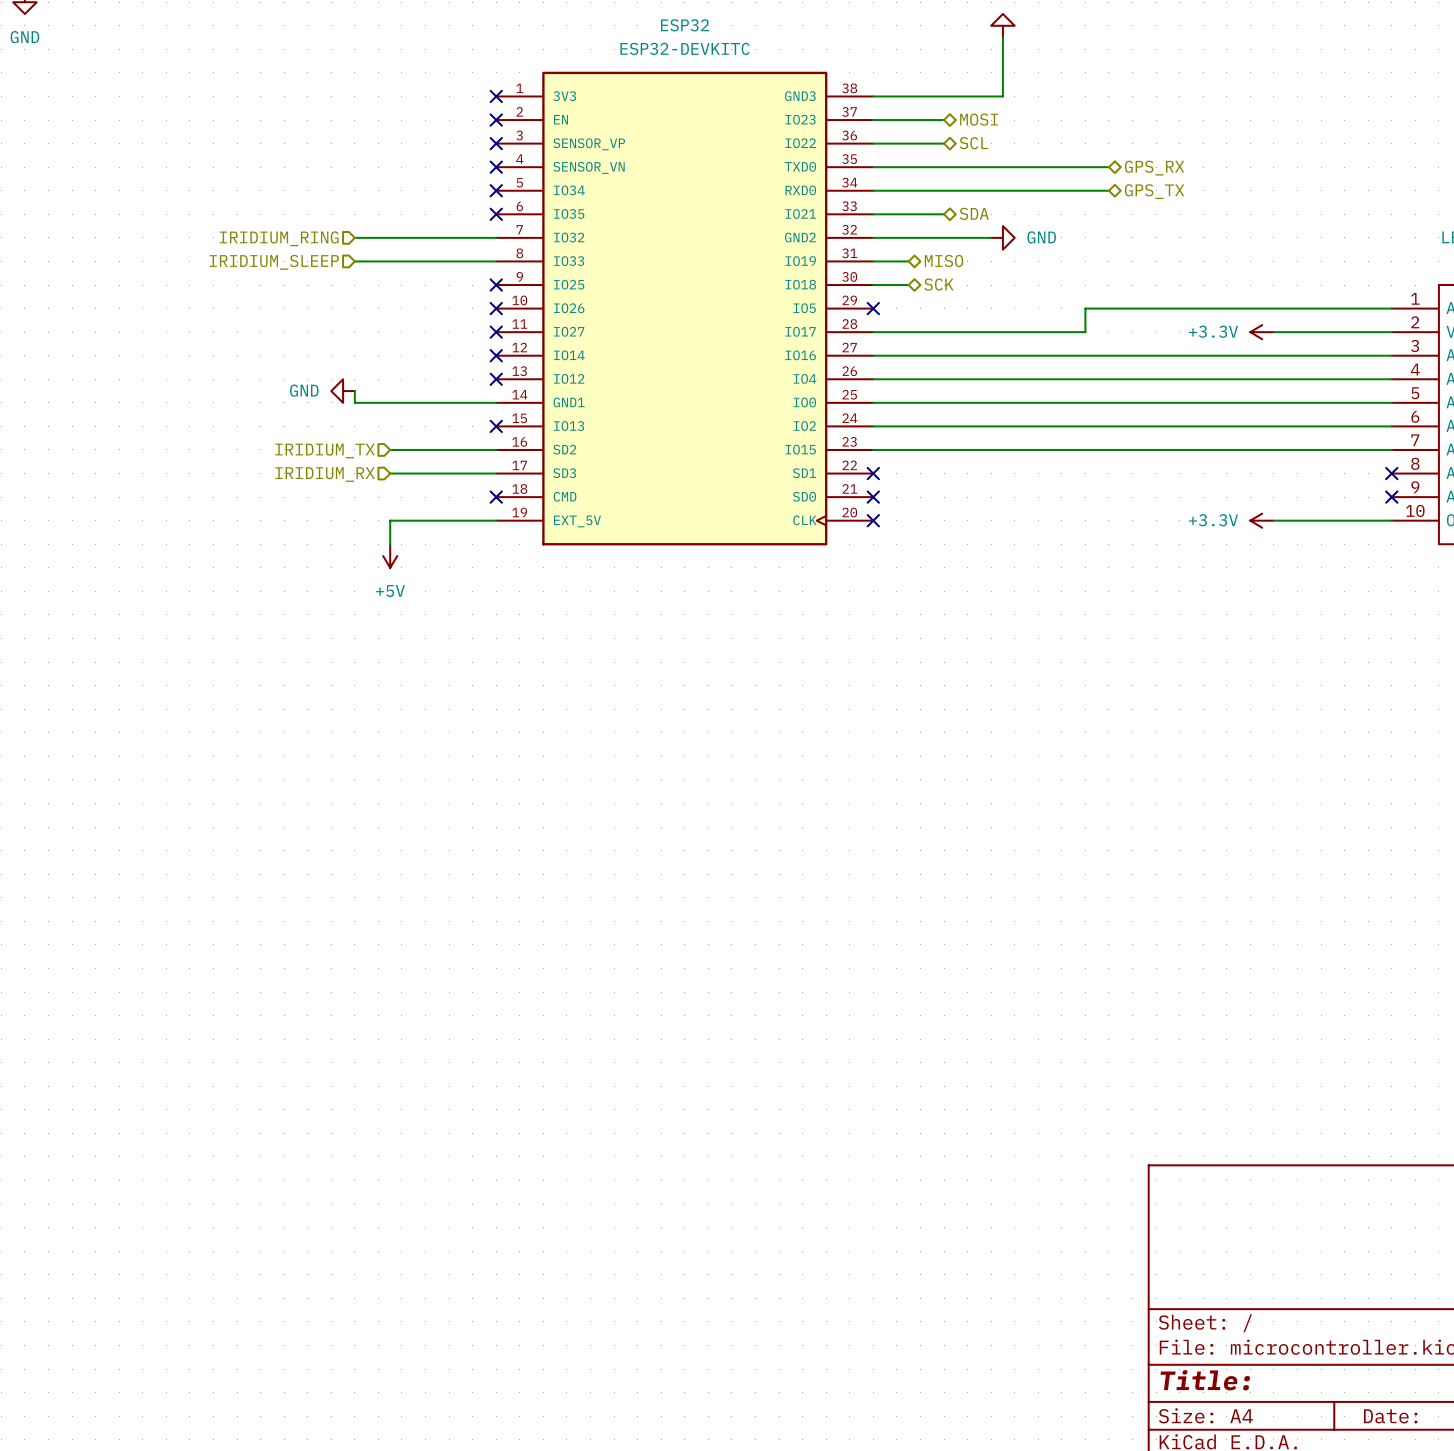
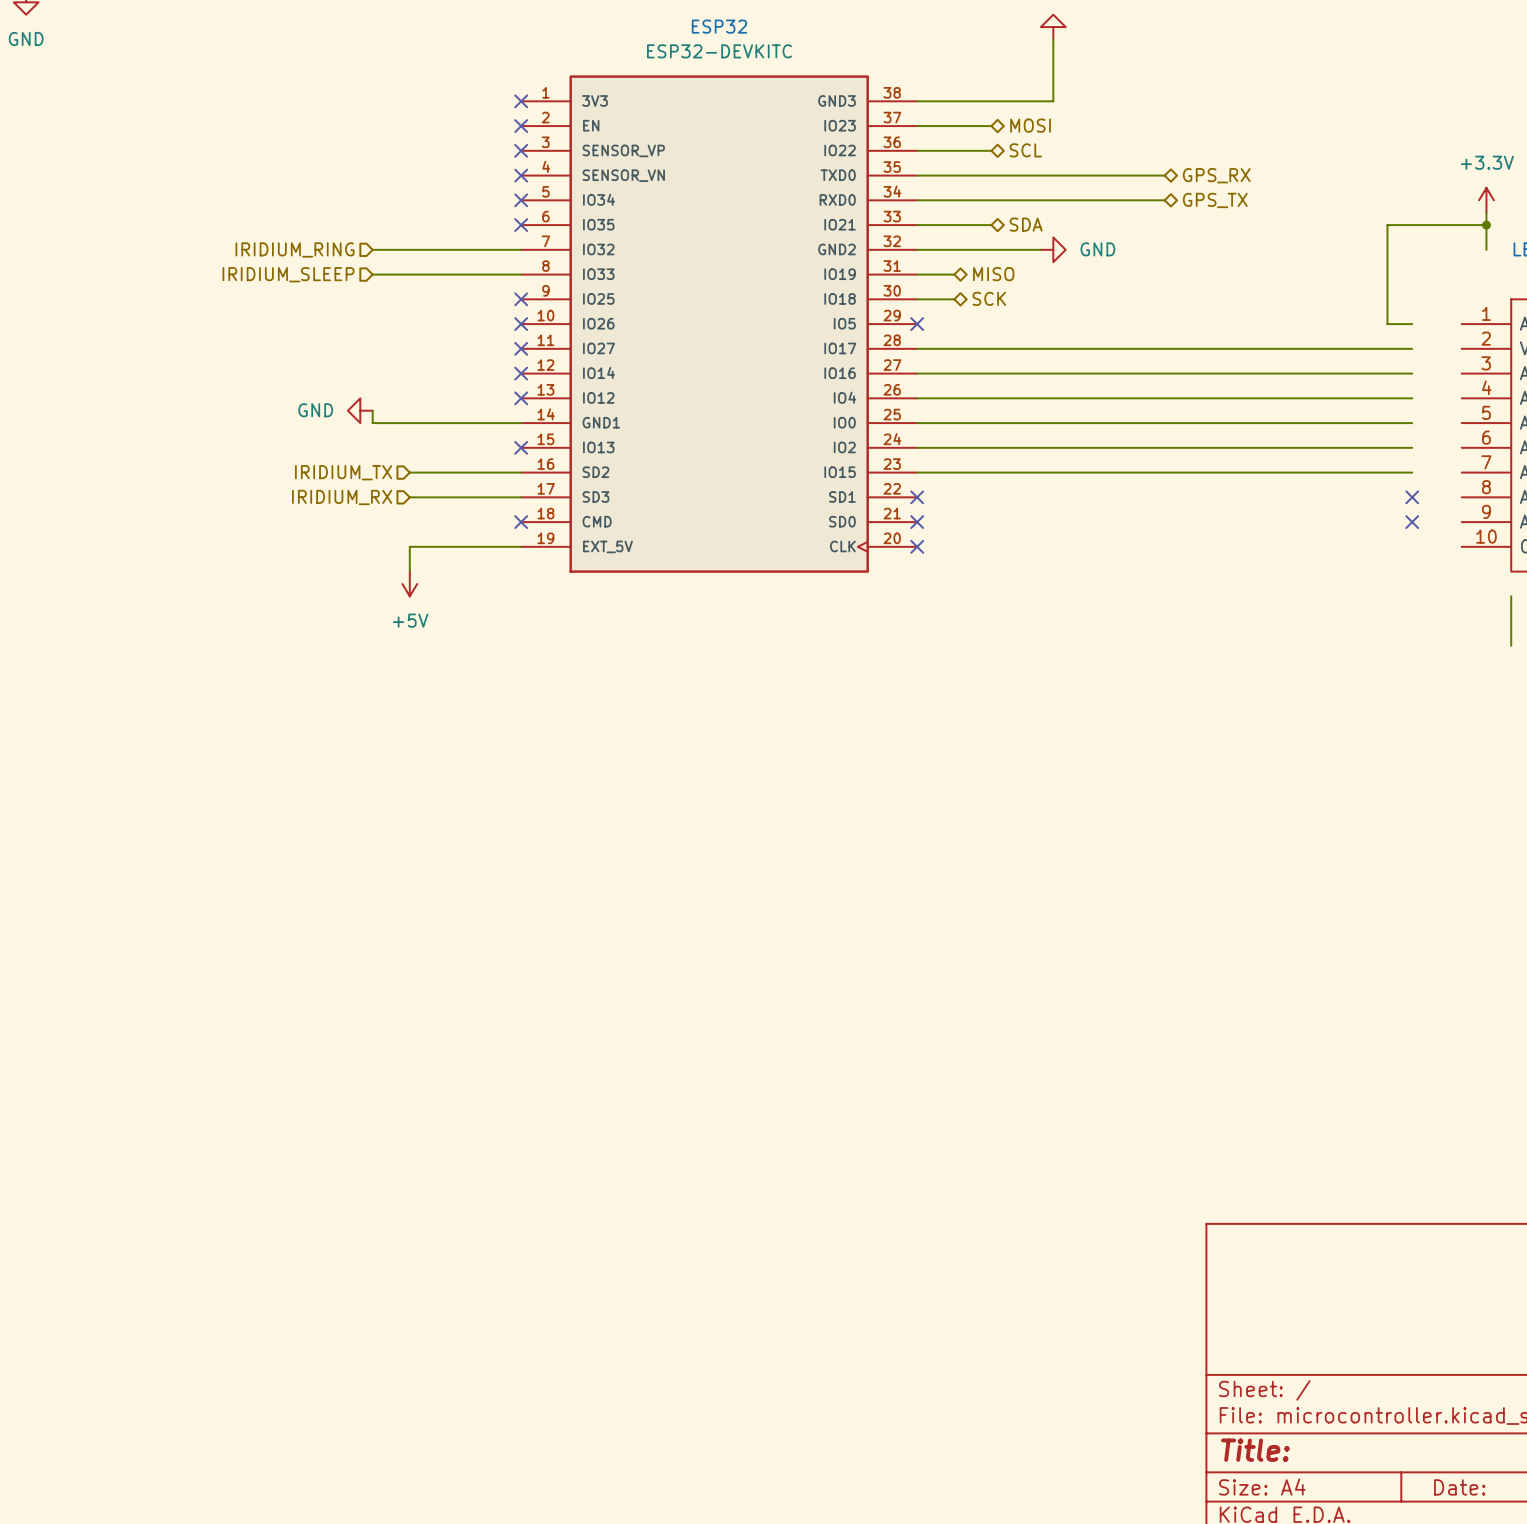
power symbol: none -> +3.3V (1486, 200)
wire: none -> (1486, 212) (1486, 249)
wire: none -> (1486, 225) (1387, 225) (1387, 324)
junction: none -> (1486, 225)
wire: (1321, 308) (1085, 308) (1085, 332) -> (1337, 348) (1139, 348)
wire: (1344, 308) (1391, 308) -> none
power symbol: +3.3V (1262, 332) -> none
wire: (1344, 332) (1391, 332) -> none
wire: (1344, 355) (1391, 355) -> none
wire: (1344, 379) (1391, 379) -> none
wire: (1344, 402) (1391, 402) -> none
wire: (1344, 426) (1391, 426) -> none
wire: (1344, 449) (1391, 449) -> none
no-connect mark: none -> (1412, 497)
no-connect mark: (1391, 473) -> none
no-connect mark: none -> (1412, 522)
no-connect mark: (1391, 497) -> none
power symbol: +3.3V (1262, 520) -> none
wire: (1273, 520) (1391, 520) -> none
wire: none -> (1511, 596) (1511, 645)

